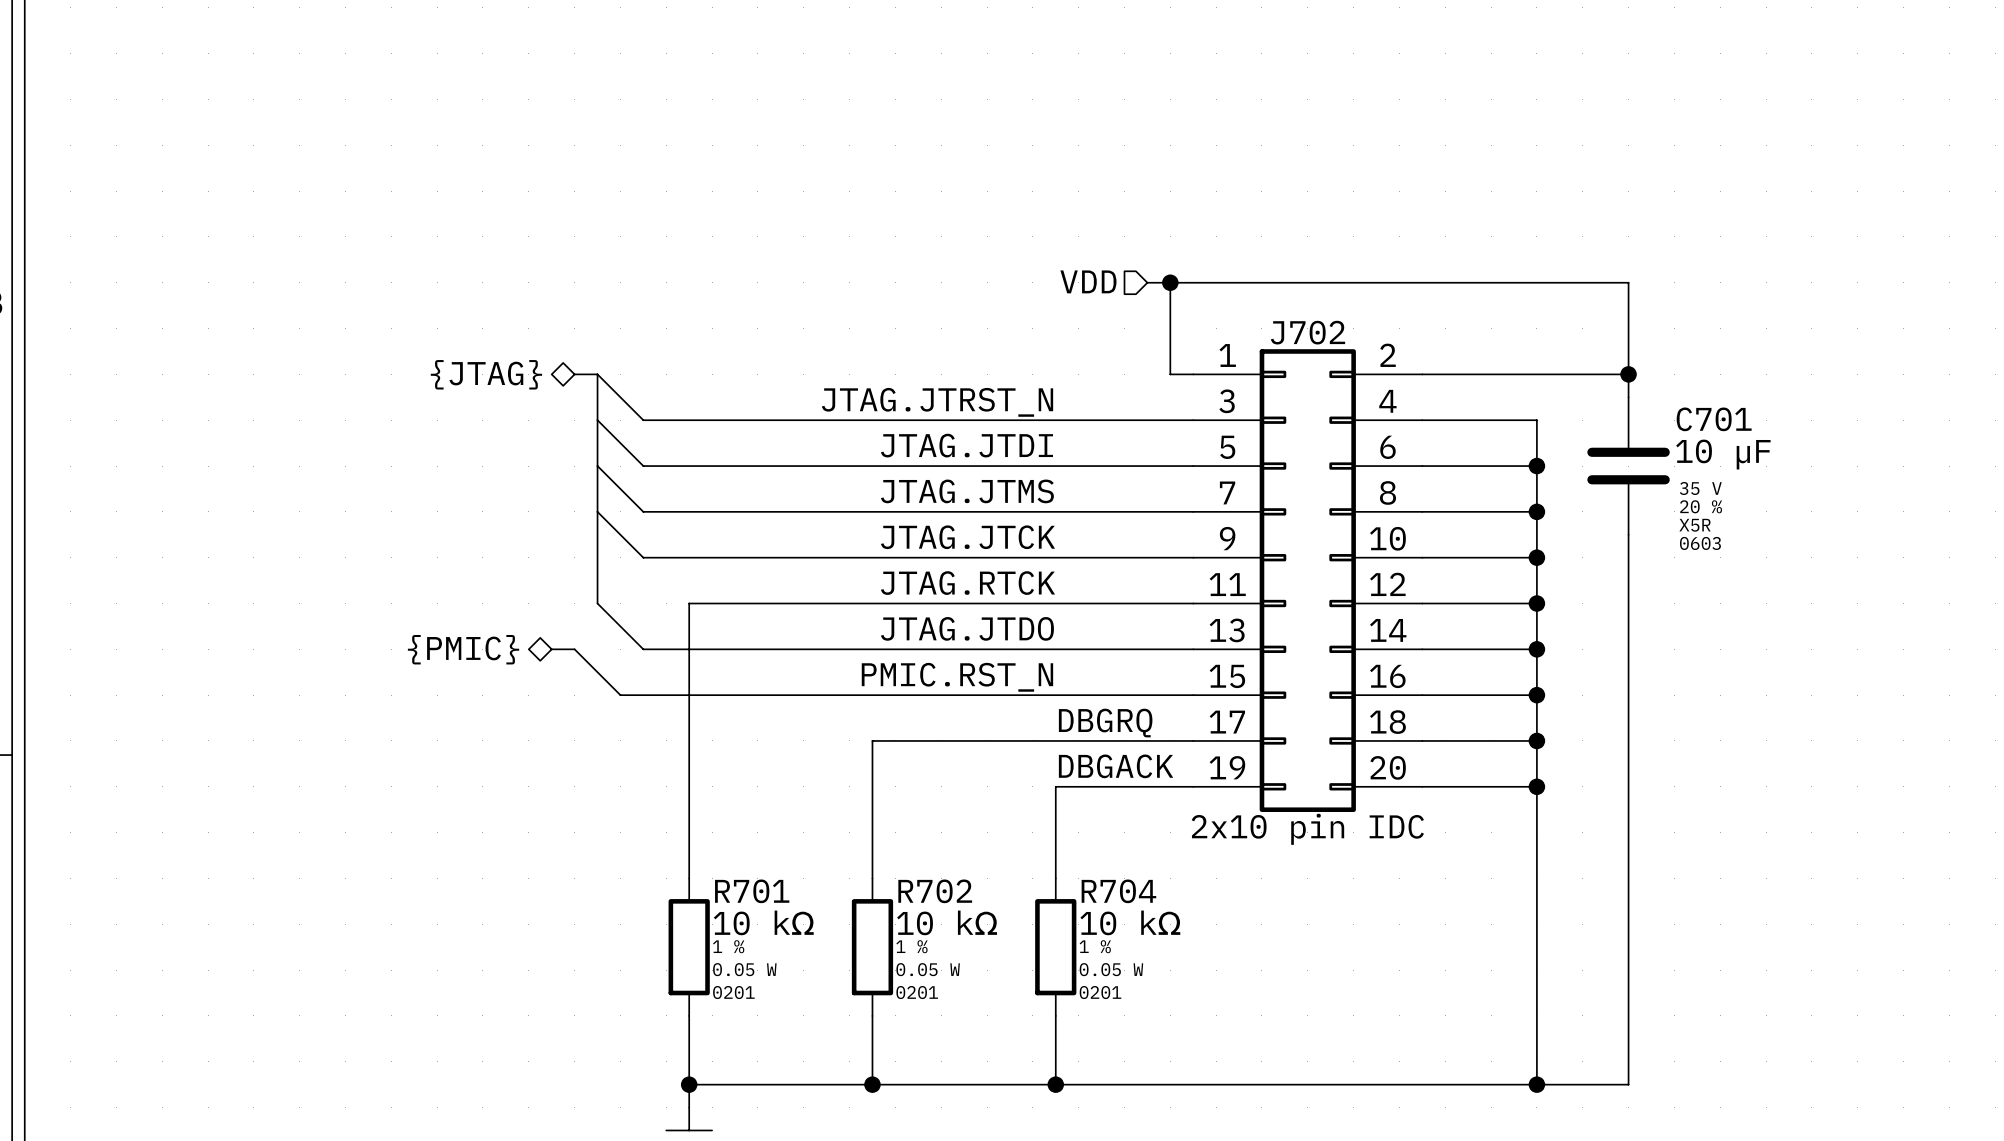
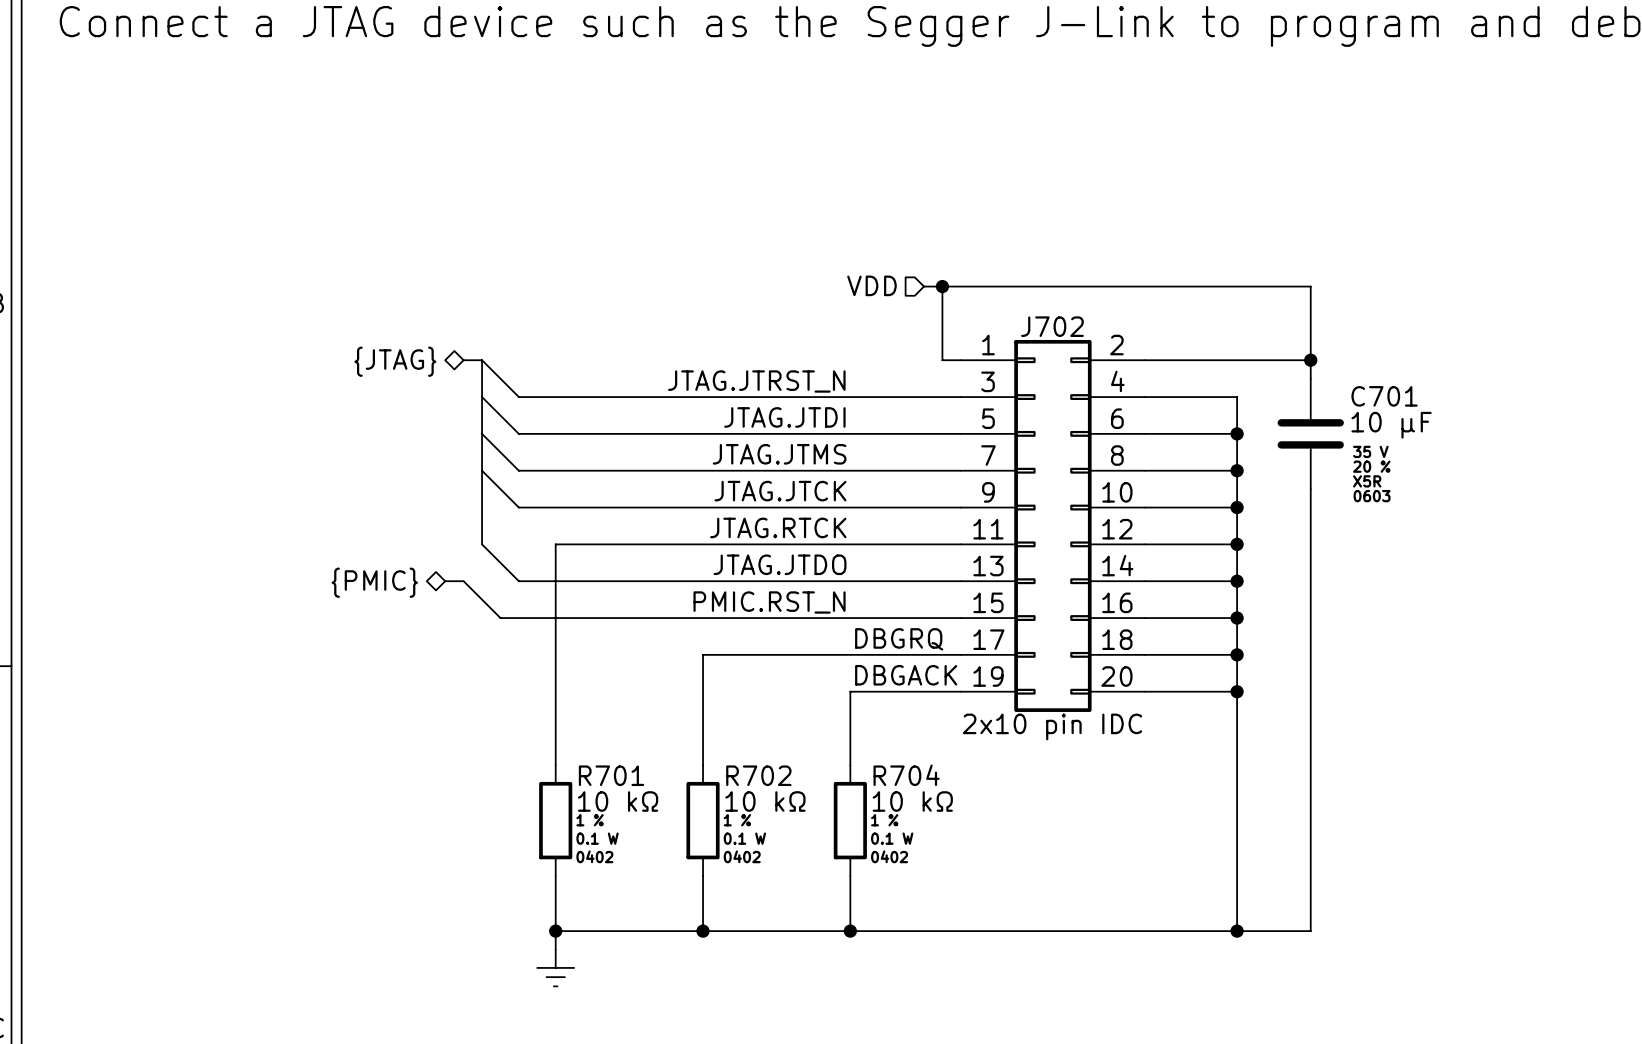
R701 text: 0.05 W (744, 969) -> 0.1 W (597, 838)
R702 text: 0.05 W (928, 969) -> 0.1 W (744, 838)
R704 text: 0.05 W (1111, 969) -> 0.1 W (892, 838)
R701 text: 0201 (733, 992) -> 0402 (594, 856)
R702 text: 0201 (917, 992) -> 0402 (742, 856)
R704 text: 0201 (1100, 992) -> 0402 (889, 856)

